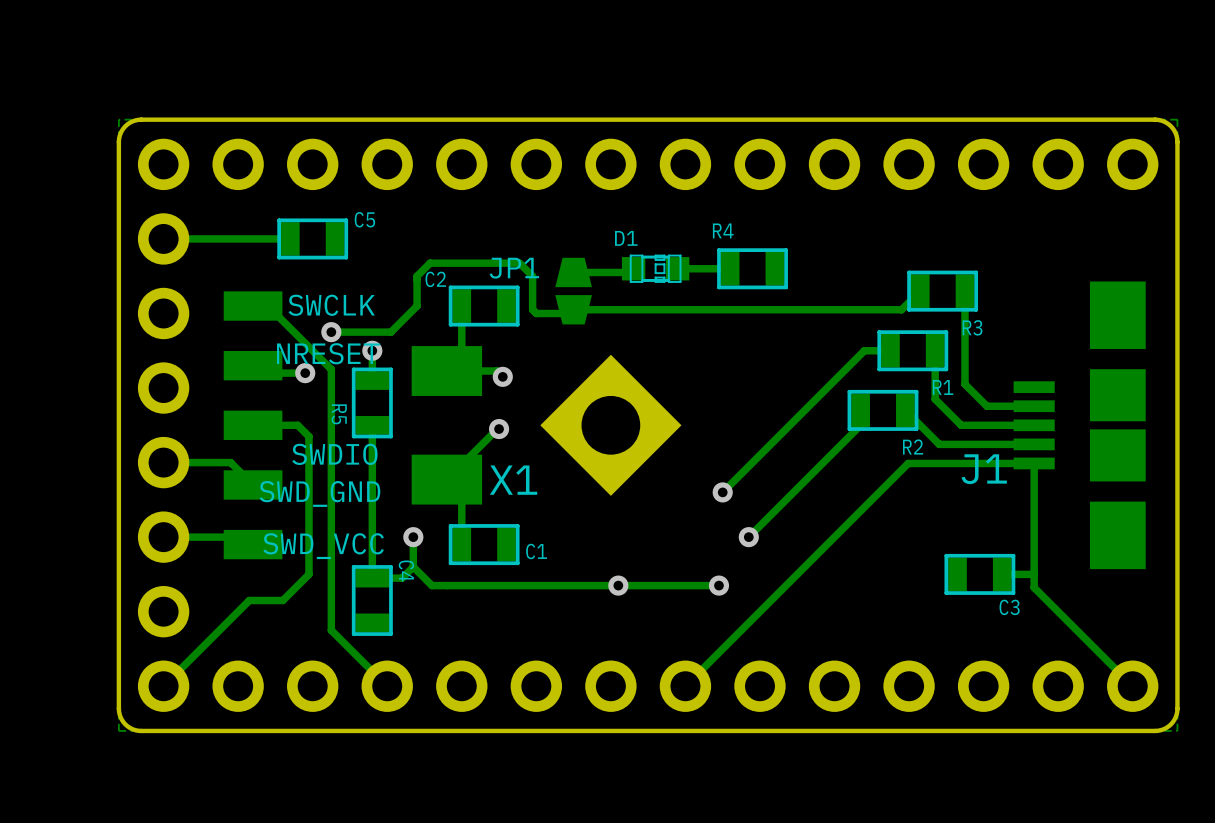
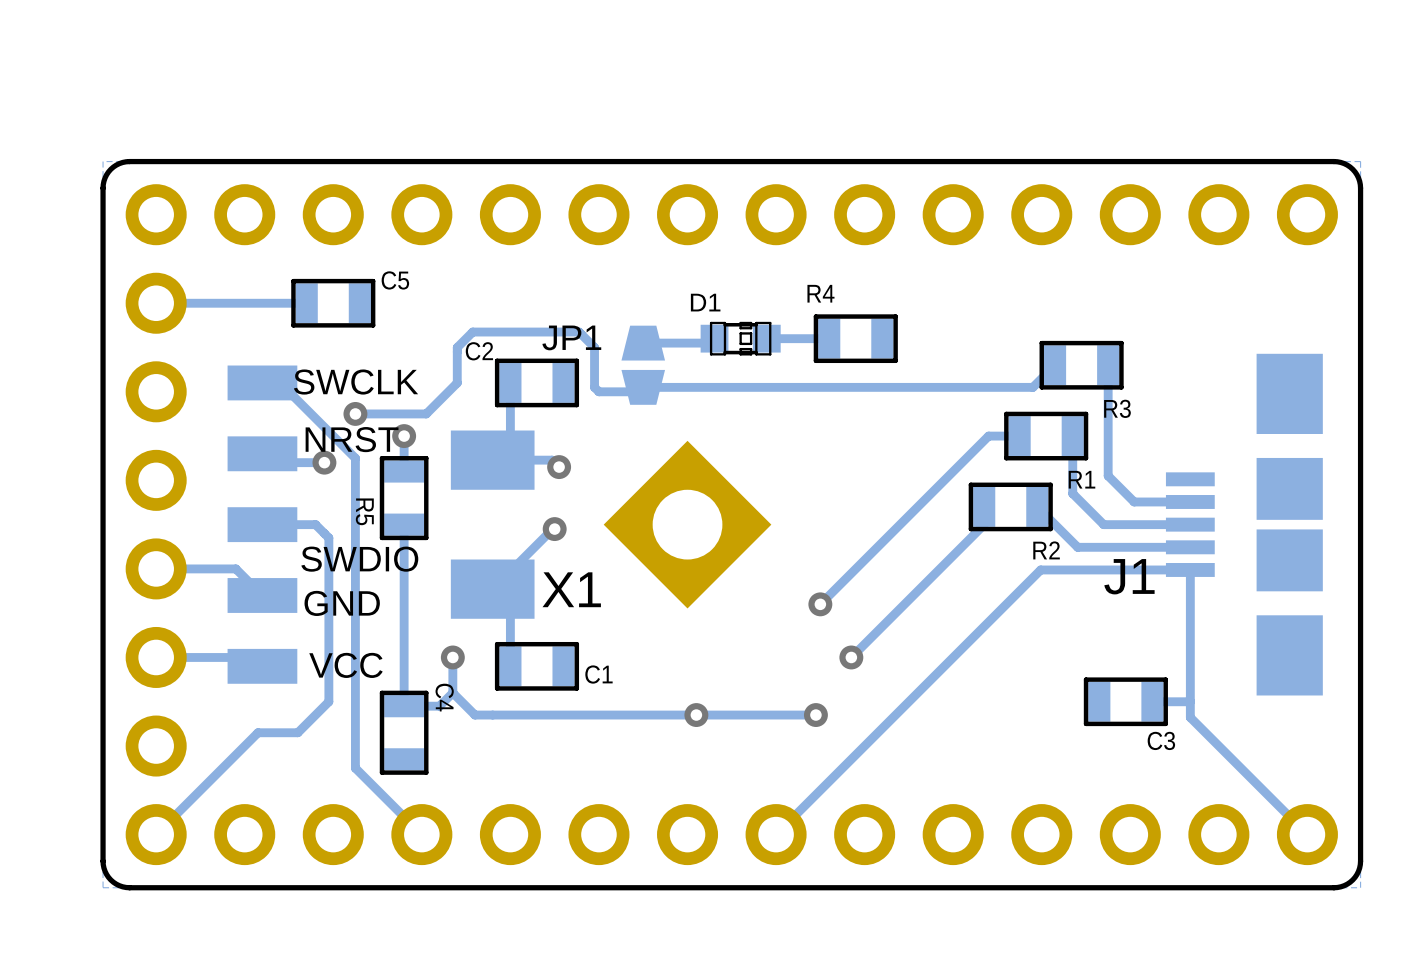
part value: NRESET (328, 353) -> NRST (352, 439)
part value: SWD_GND (319, 493) -> GND (342, 603)
part value: SWD_VCC (323, 546) -> VCC (345, 665)

